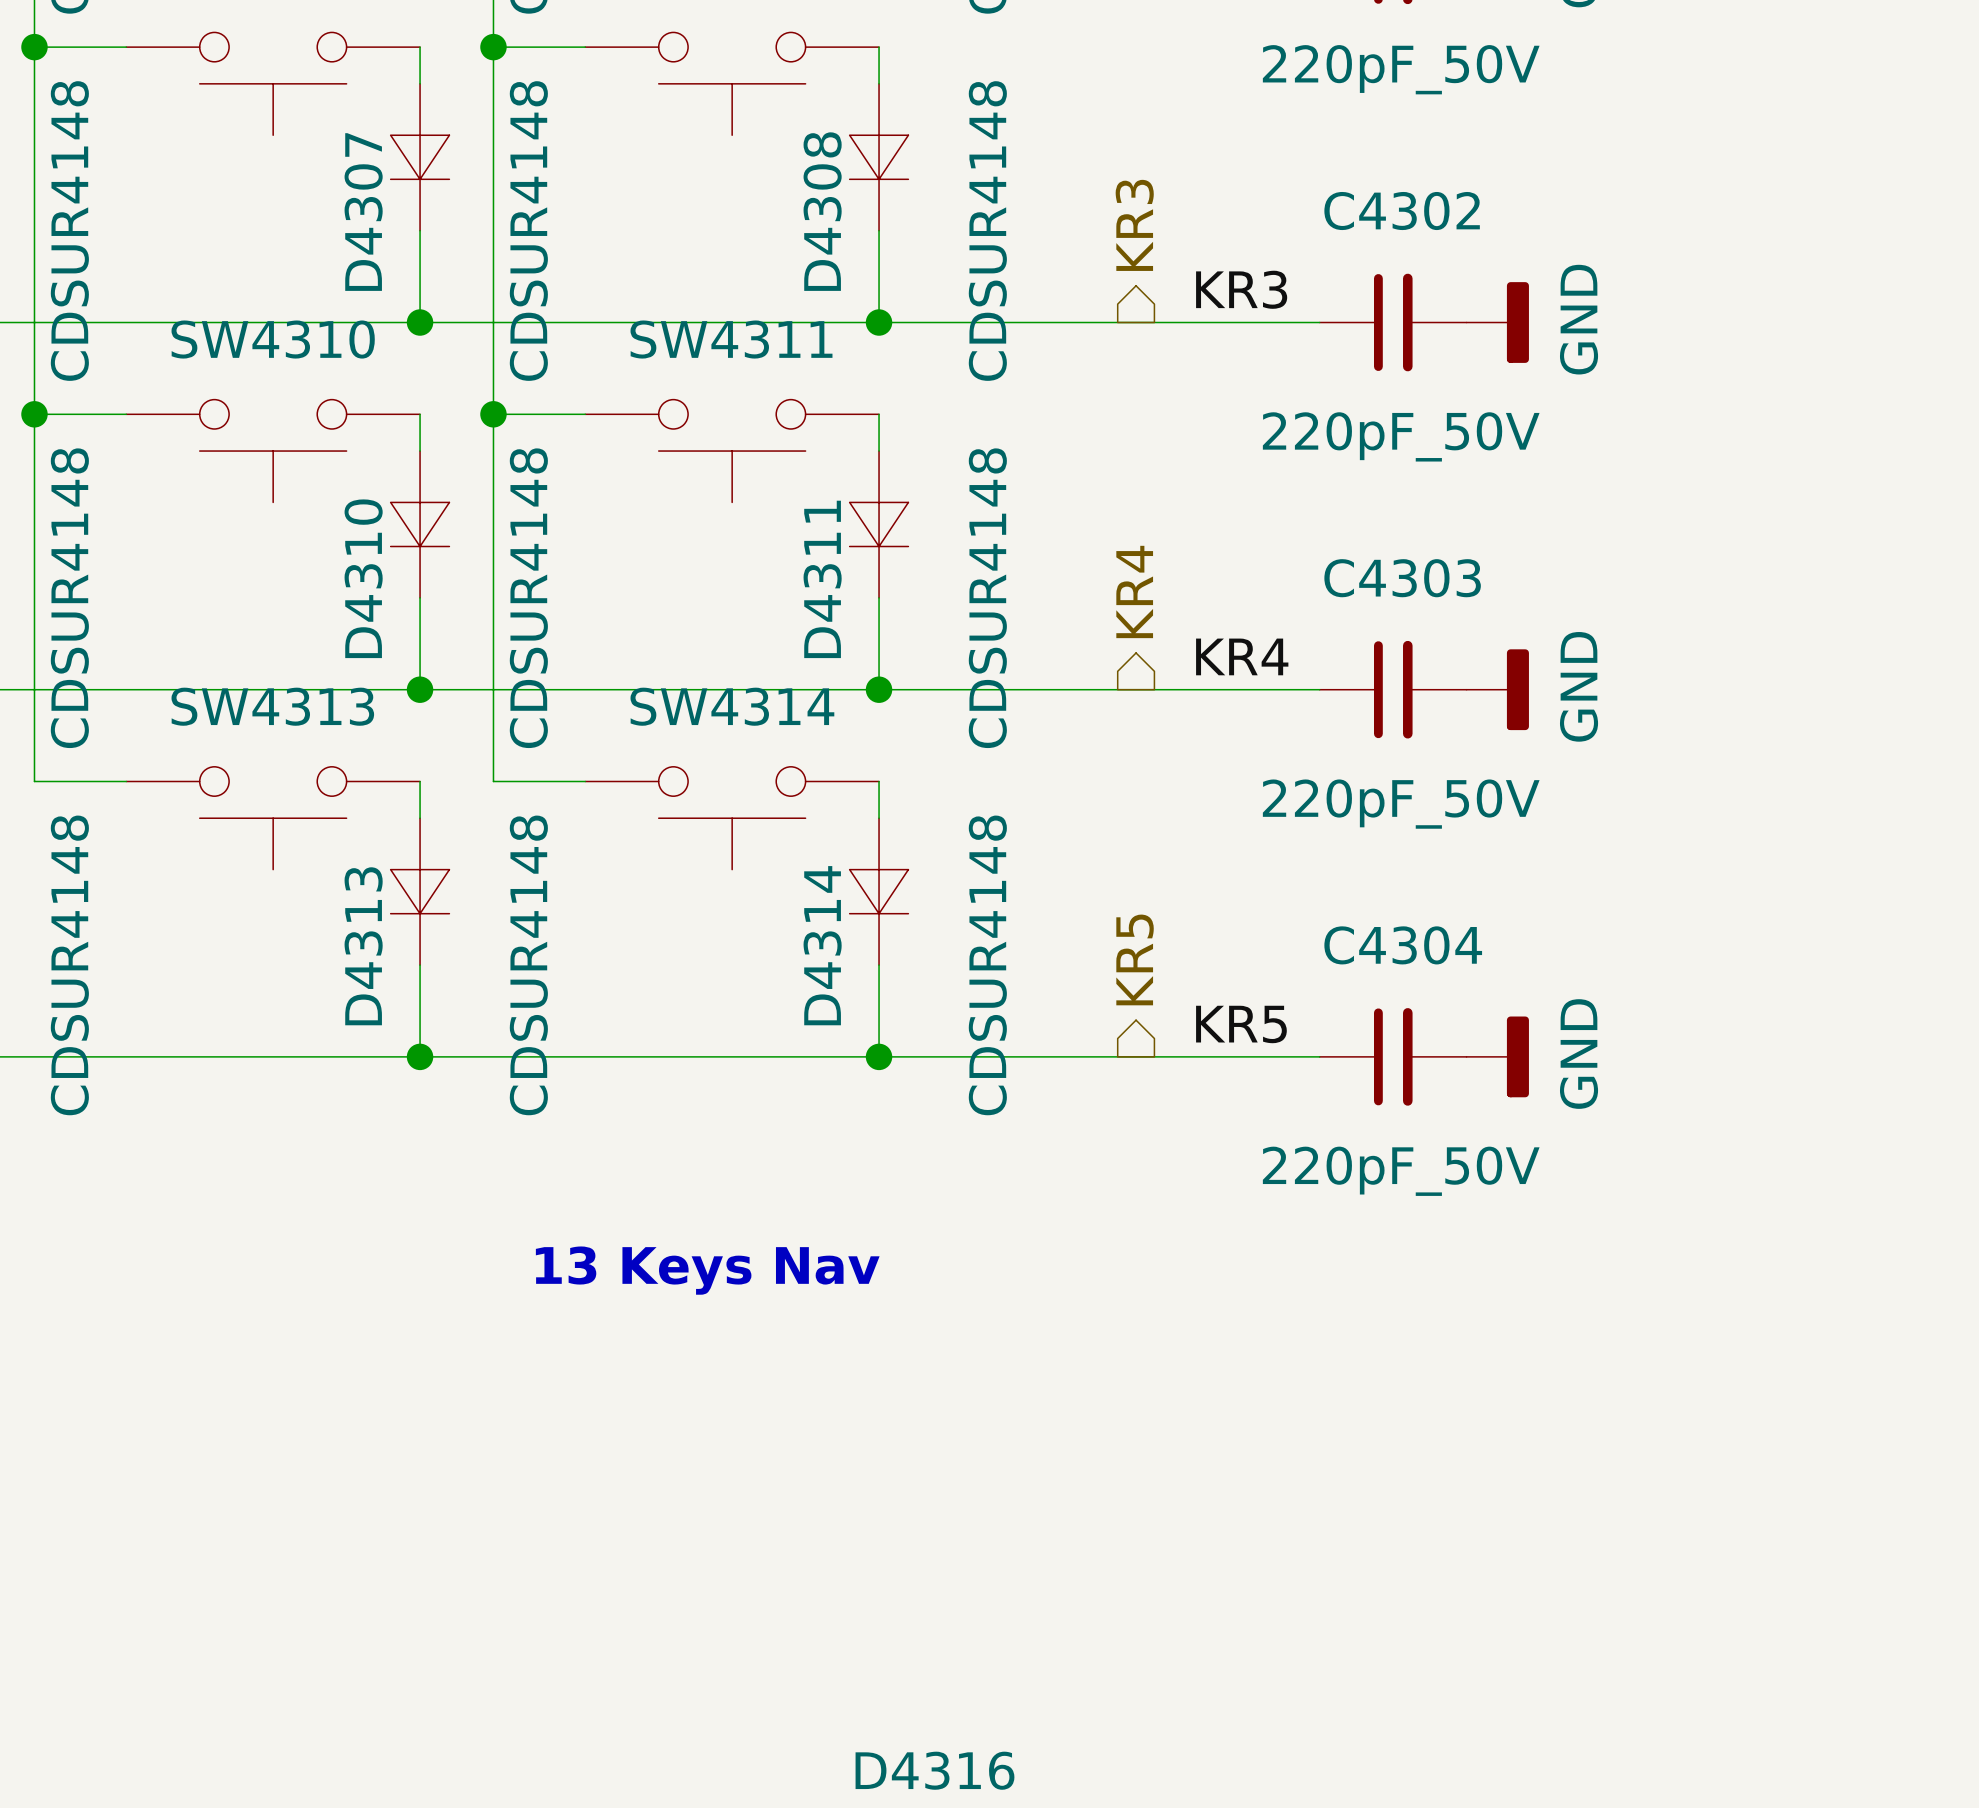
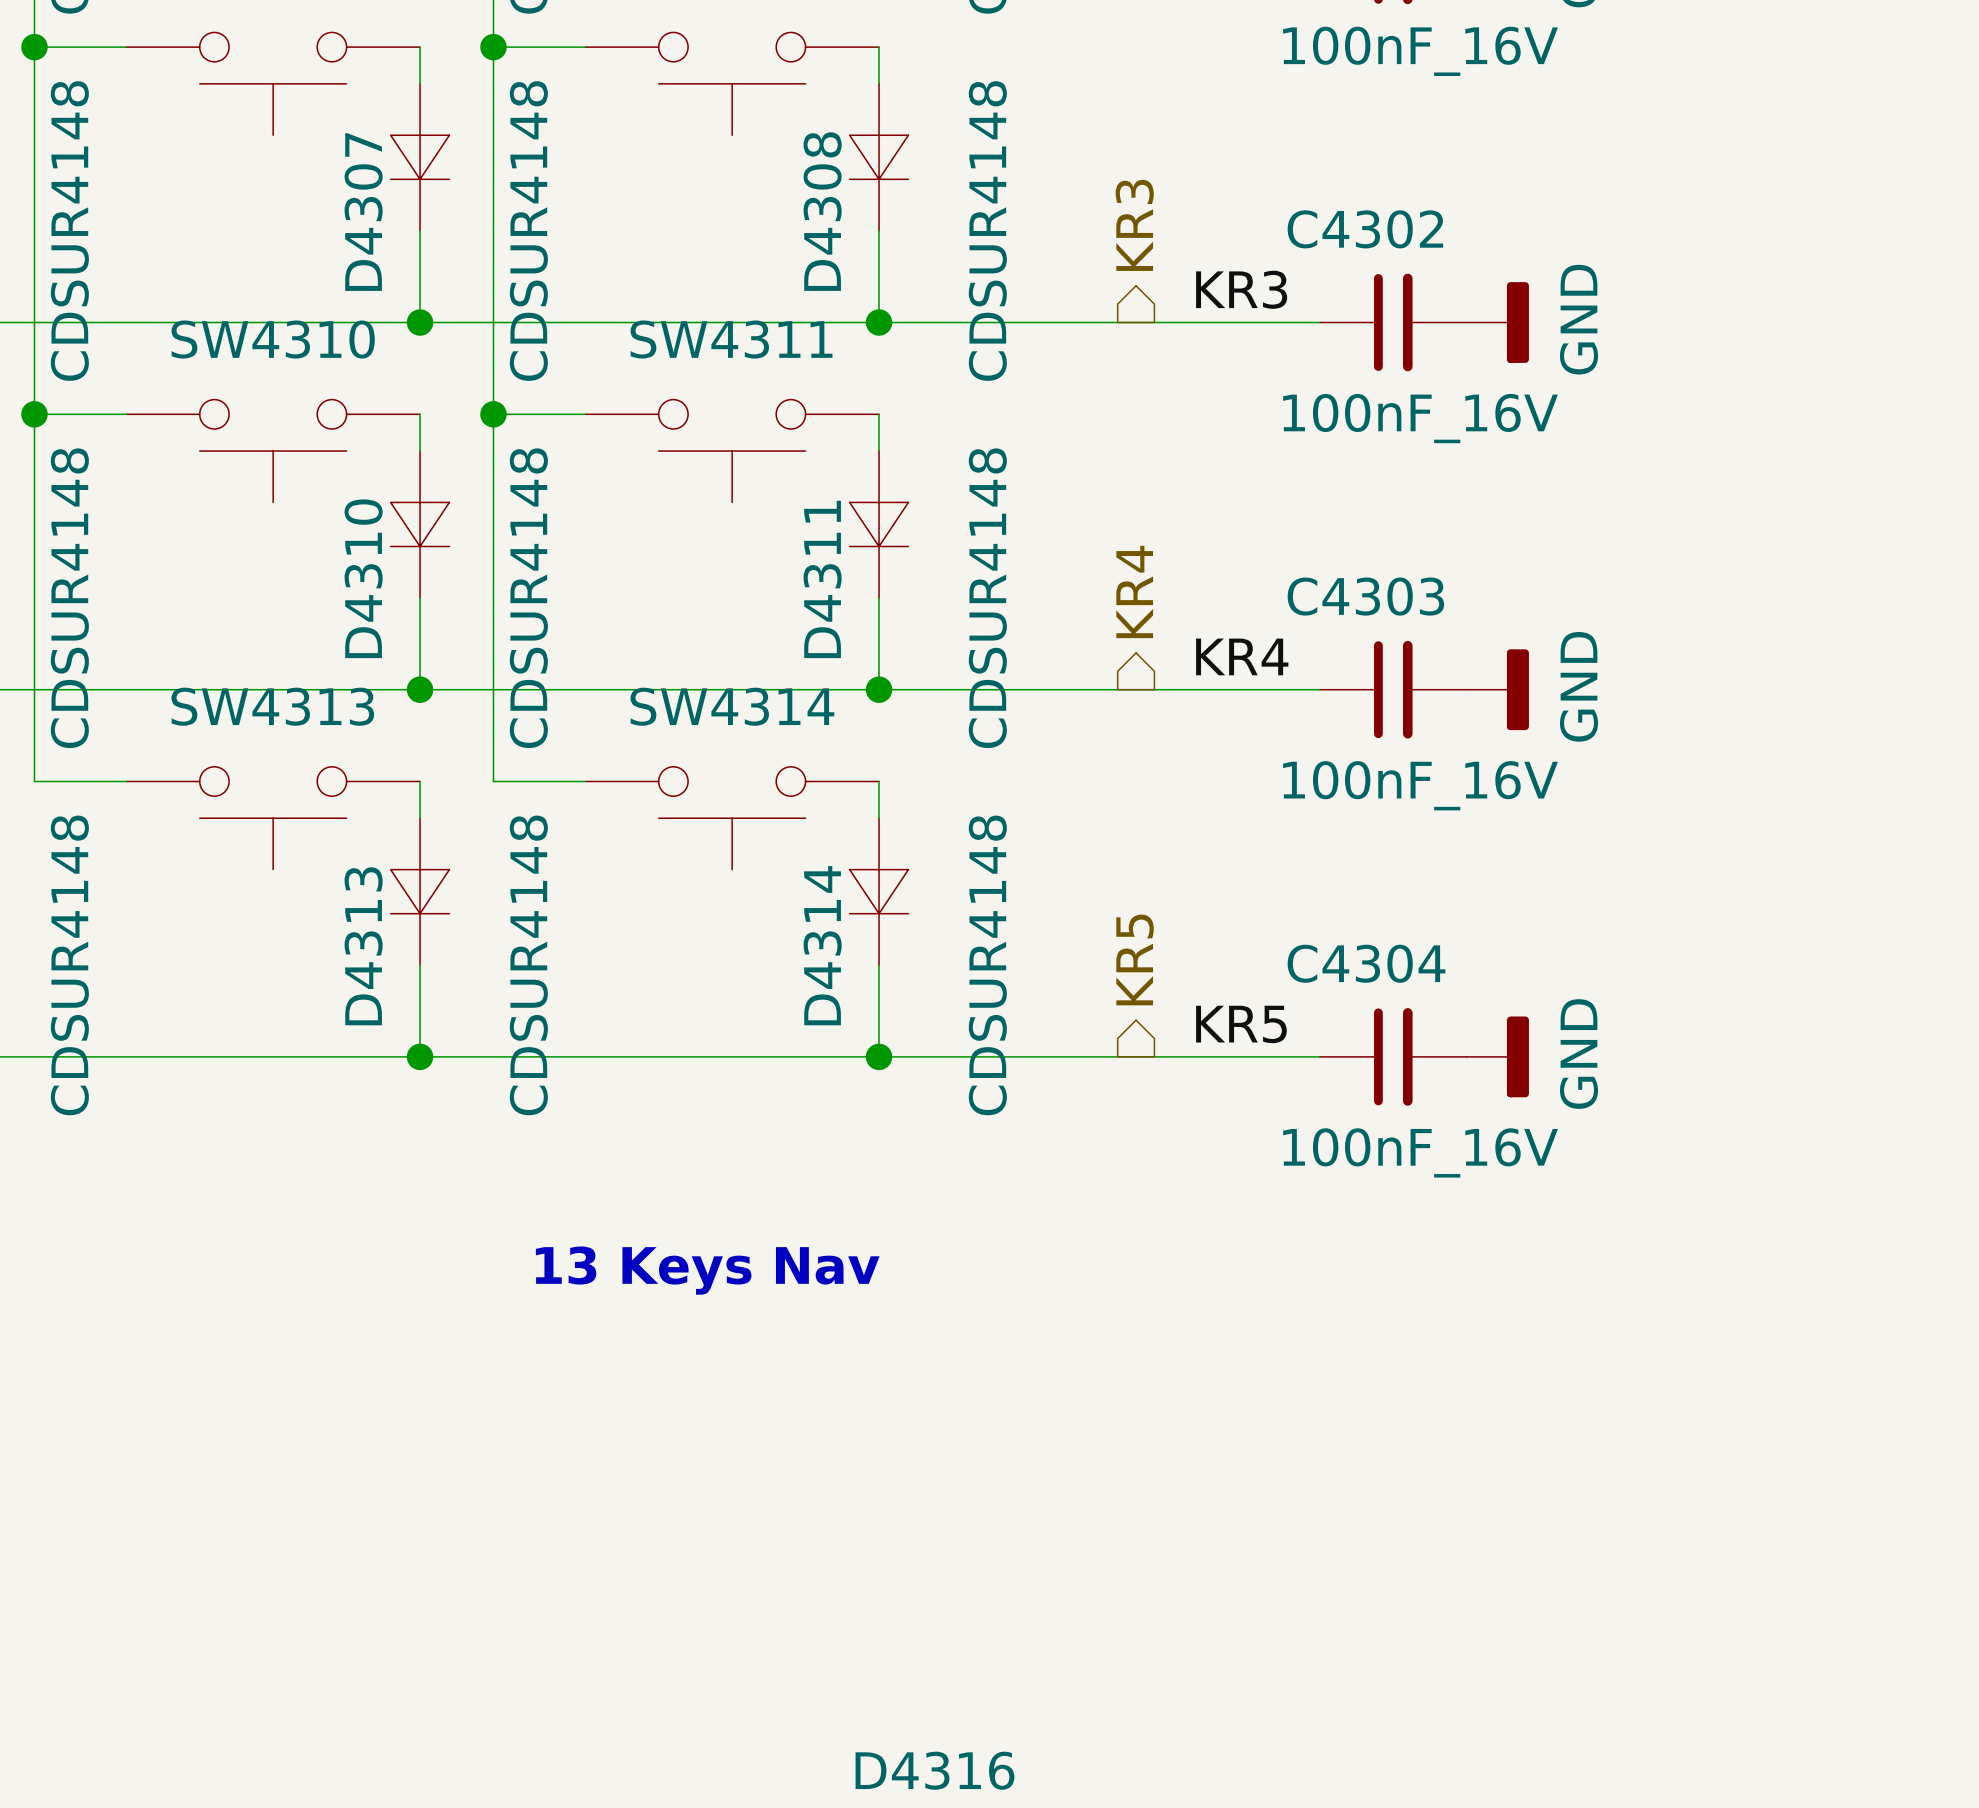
part value: 220pF_50V (1401, 69) -> 100nF_16V (1420, 51)
C4302 name position: C4302 (1402, 211) -> C4302 (1365, 229)
C4302 value: 220pF_50V (1401, 436) -> 100nF_16V (1420, 418)
C4303 name position: C4303 (1402, 578) -> C4303 (1365, 596)
C4303 value: 220pF_50V (1401, 804) -> 100nF_16V (1420, 785)
C4304 name position: C4304 (1403, 945) -> C4304 (1366, 963)
C4304 value: 220pF_50V (1401, 1171) -> 100nF_16V (1420, 1152)

